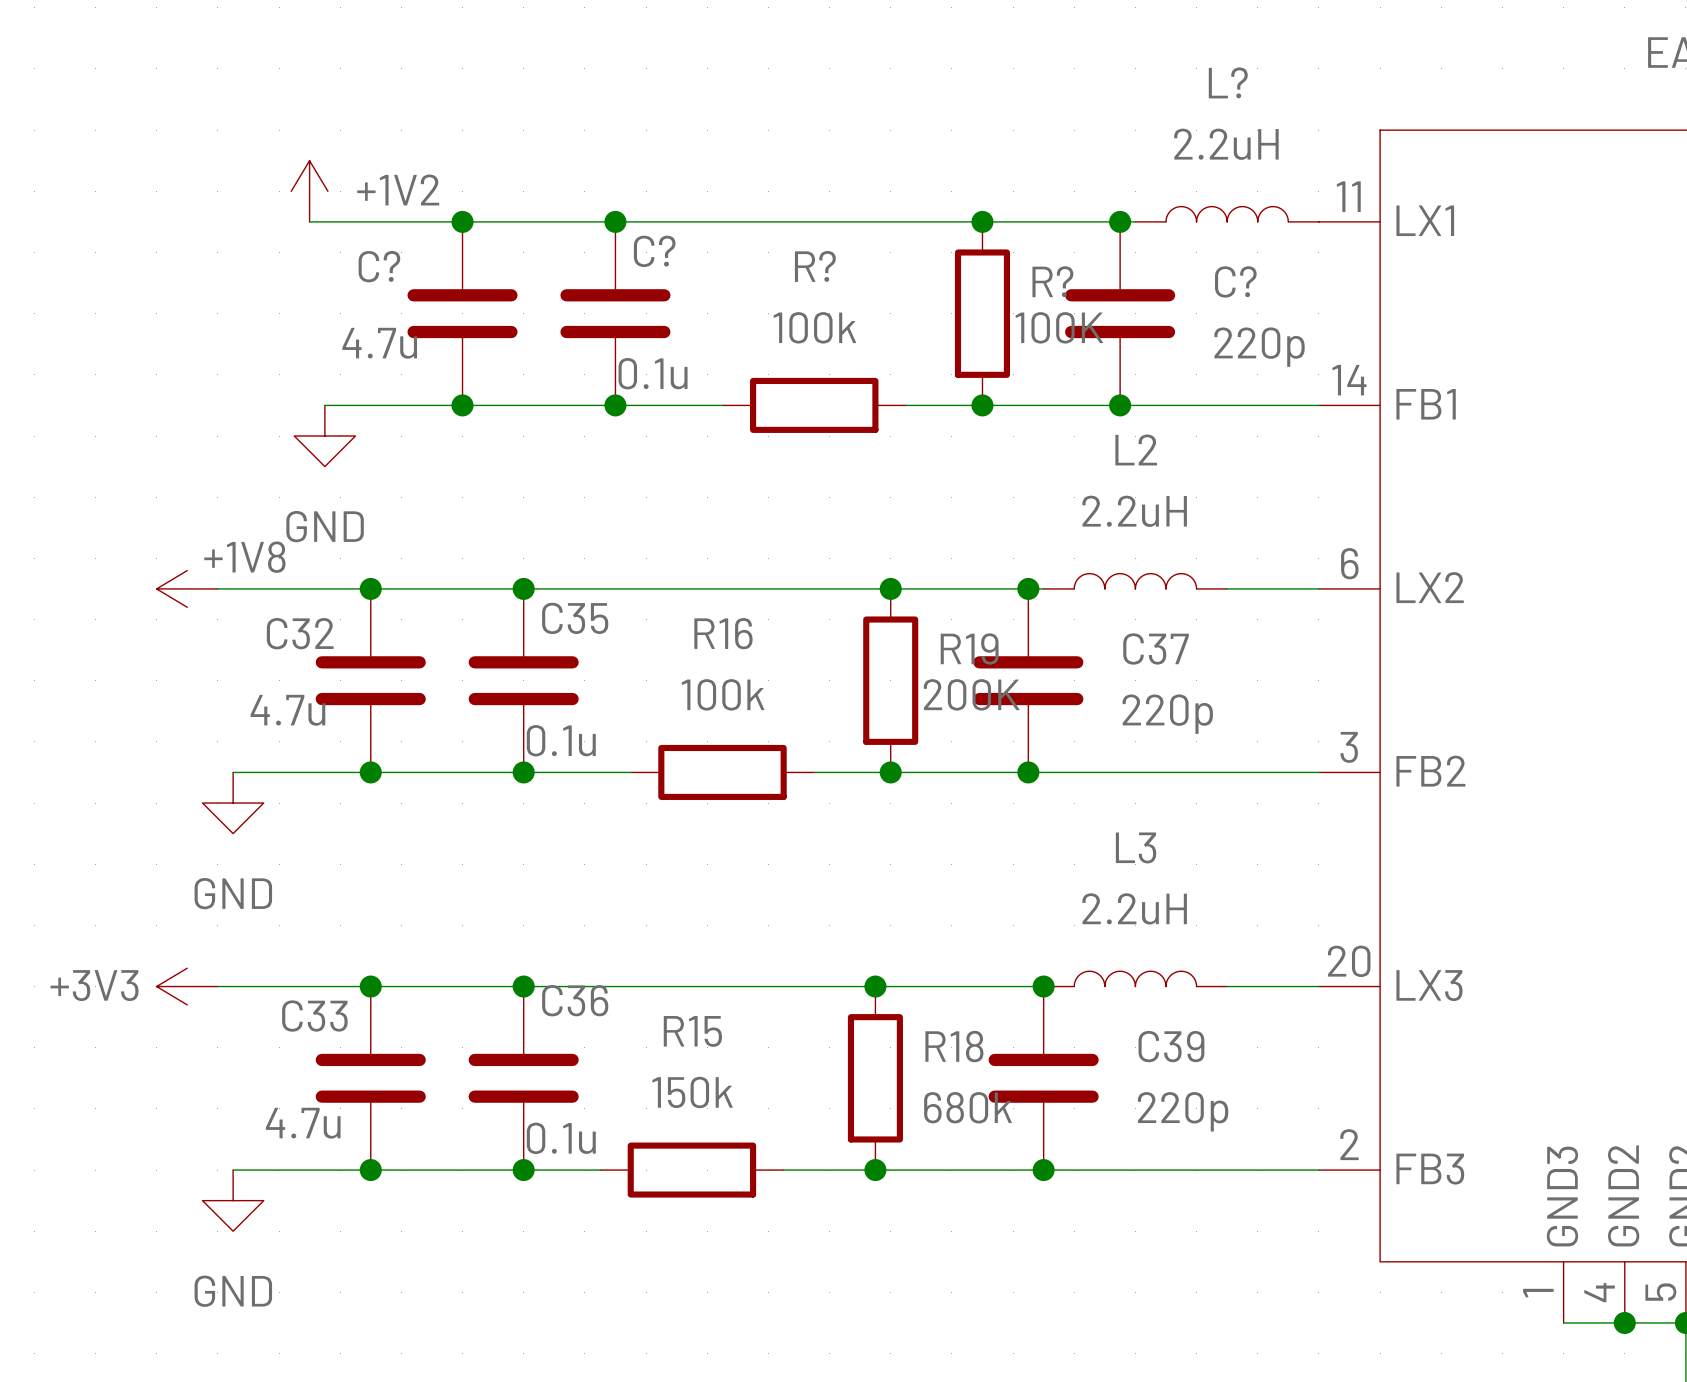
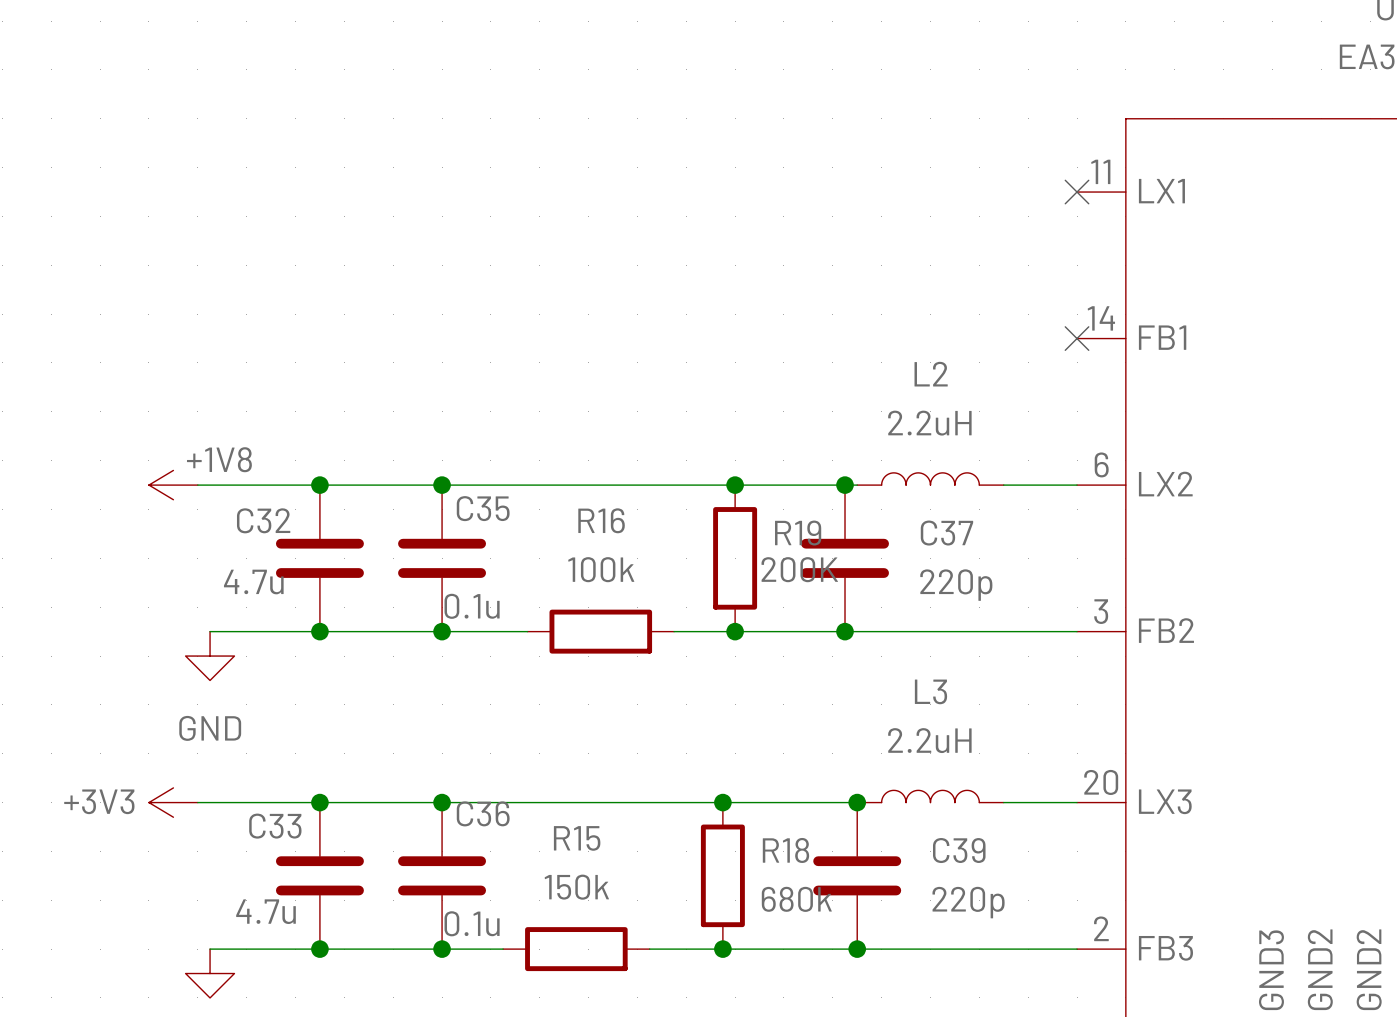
power symbol: +1V2 (309, 191) -> none
L?: 2.2uH (1227, 214) -> none
wire: (309, 221) (1135, 221) -> none
junction: (462, 221) -> none
junction: (615, 221) -> none
junction: (982, 221) -> none
junction: (1120, 221) -> none
no-connect mark: none -> (1077, 192)
C?: 4.7u (462, 313) -> none
C?: 0.1u (615, 313) -> none
R?: 100K (982, 313) -> none
C?: 220p (1120, 313) -> none
wire: (324, 405) (722, 405) -> none
junction: (462, 405) -> none
junction: (615, 405) -> none
R?: 100k (814, 405) -> none
wire: (906, 405) (1318, 405) -> none
junction: (982, 405) -> none
junction: (1120, 405) -> none
no-connect mark: none -> (1077, 338)
power symbol: GND (324, 436) -> none

